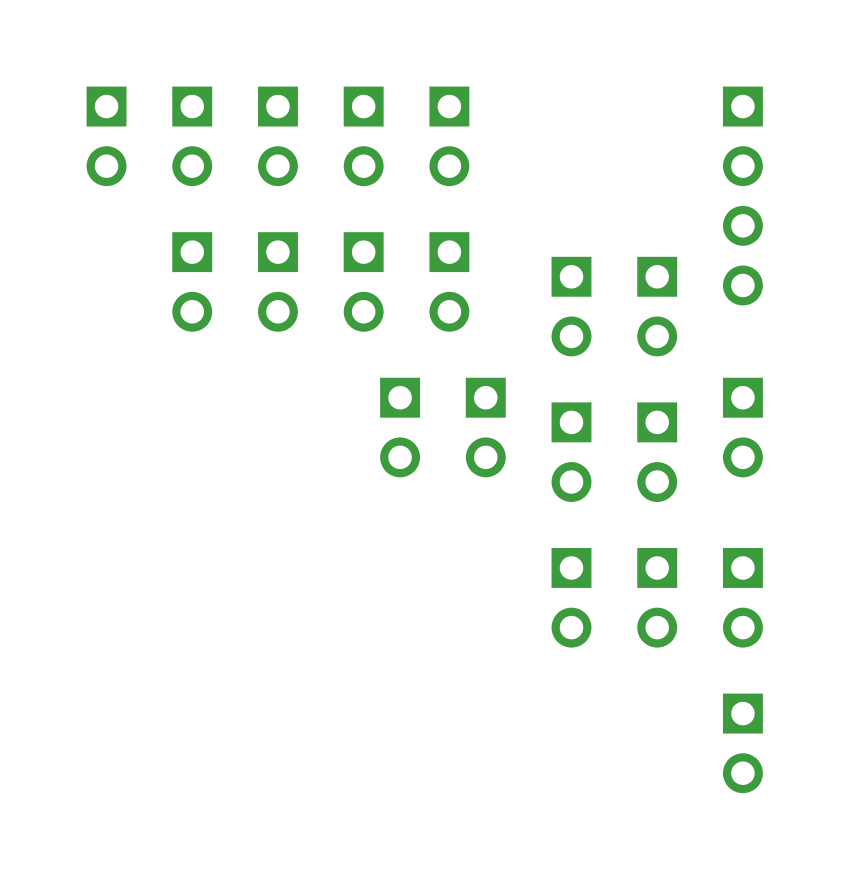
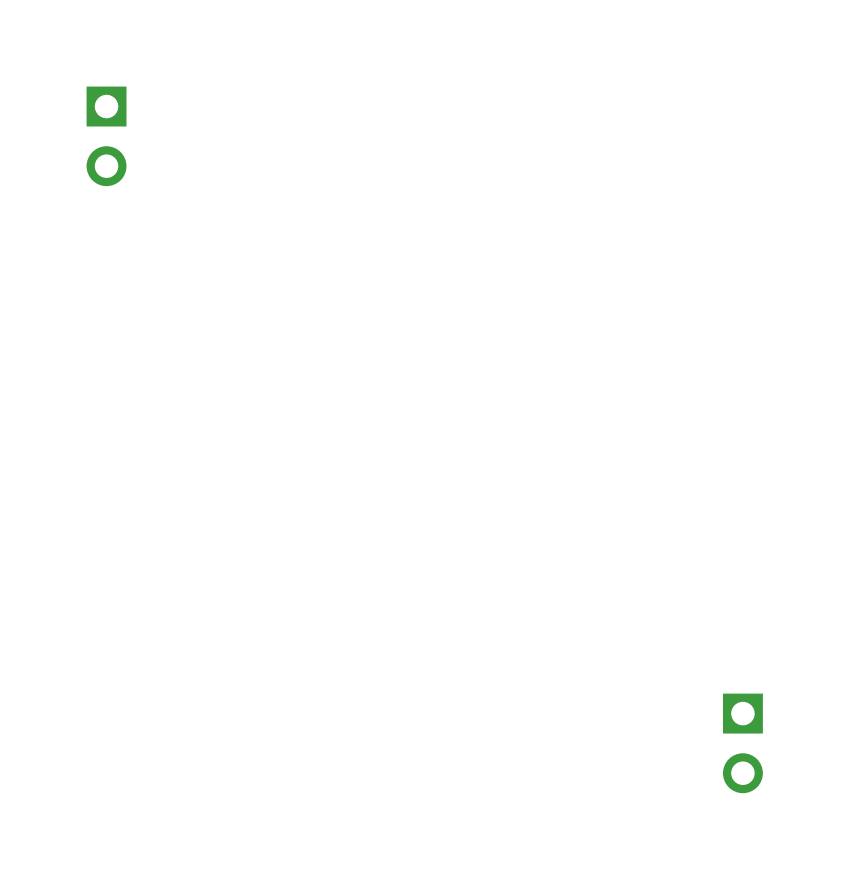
part: (192, 136) -> none
part: (277, 136) -> none
part: (363, 136) -> none
part: (449, 136) -> none
part: (742, 196) -> none
part: (192, 281) -> none
part: (277, 281) -> none
part: (363, 281) -> none
part: (449, 281) -> none
part: (571, 306) -> none
part: (657, 306) -> none
part: (400, 427) -> none
part: (485, 427) -> none
part: (742, 427) -> none
part: (571, 452) -> none
part: (657, 452) -> none
part: (571, 597) -> none
part: (657, 597) -> none
part: (742, 597) -> none

